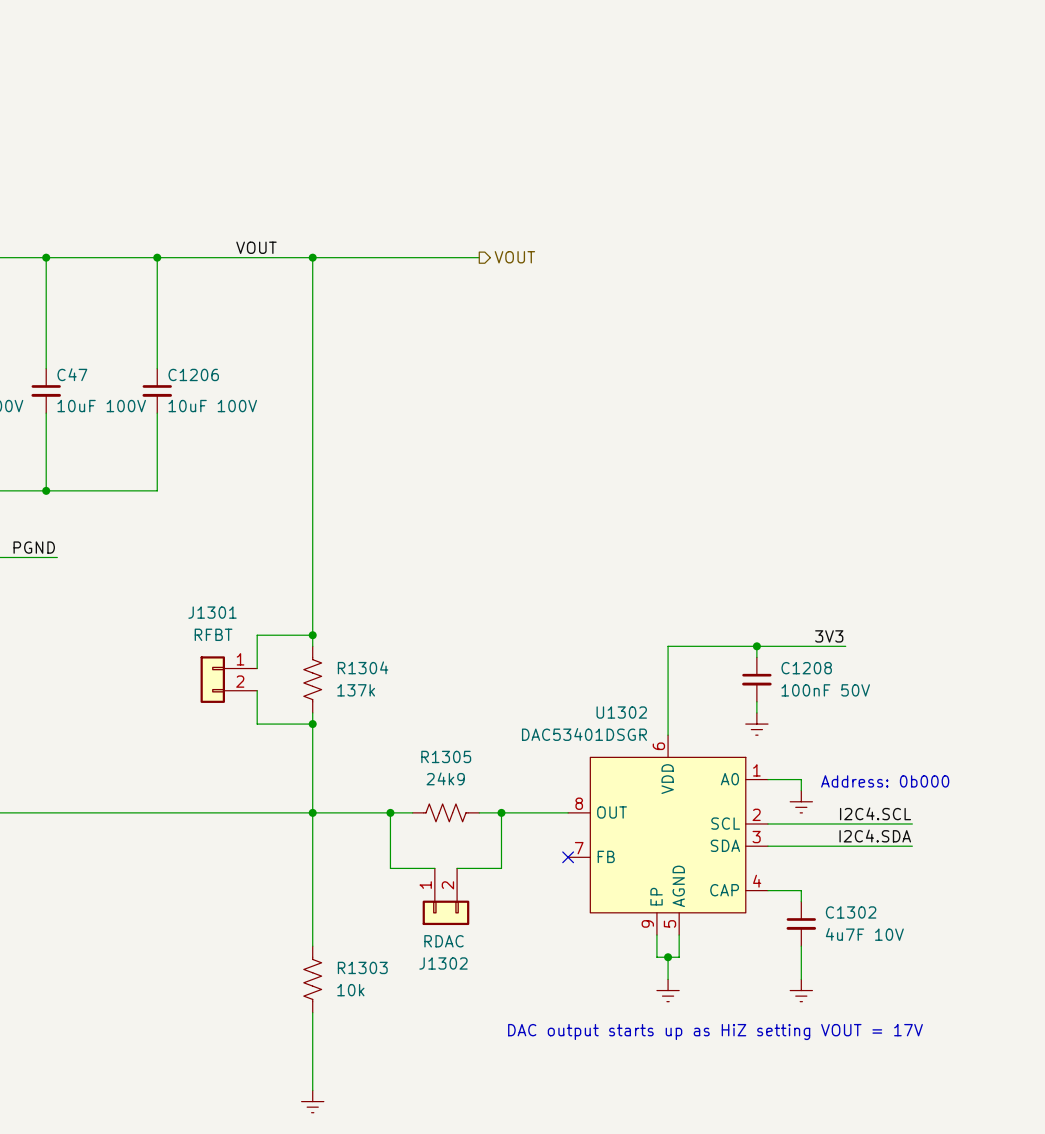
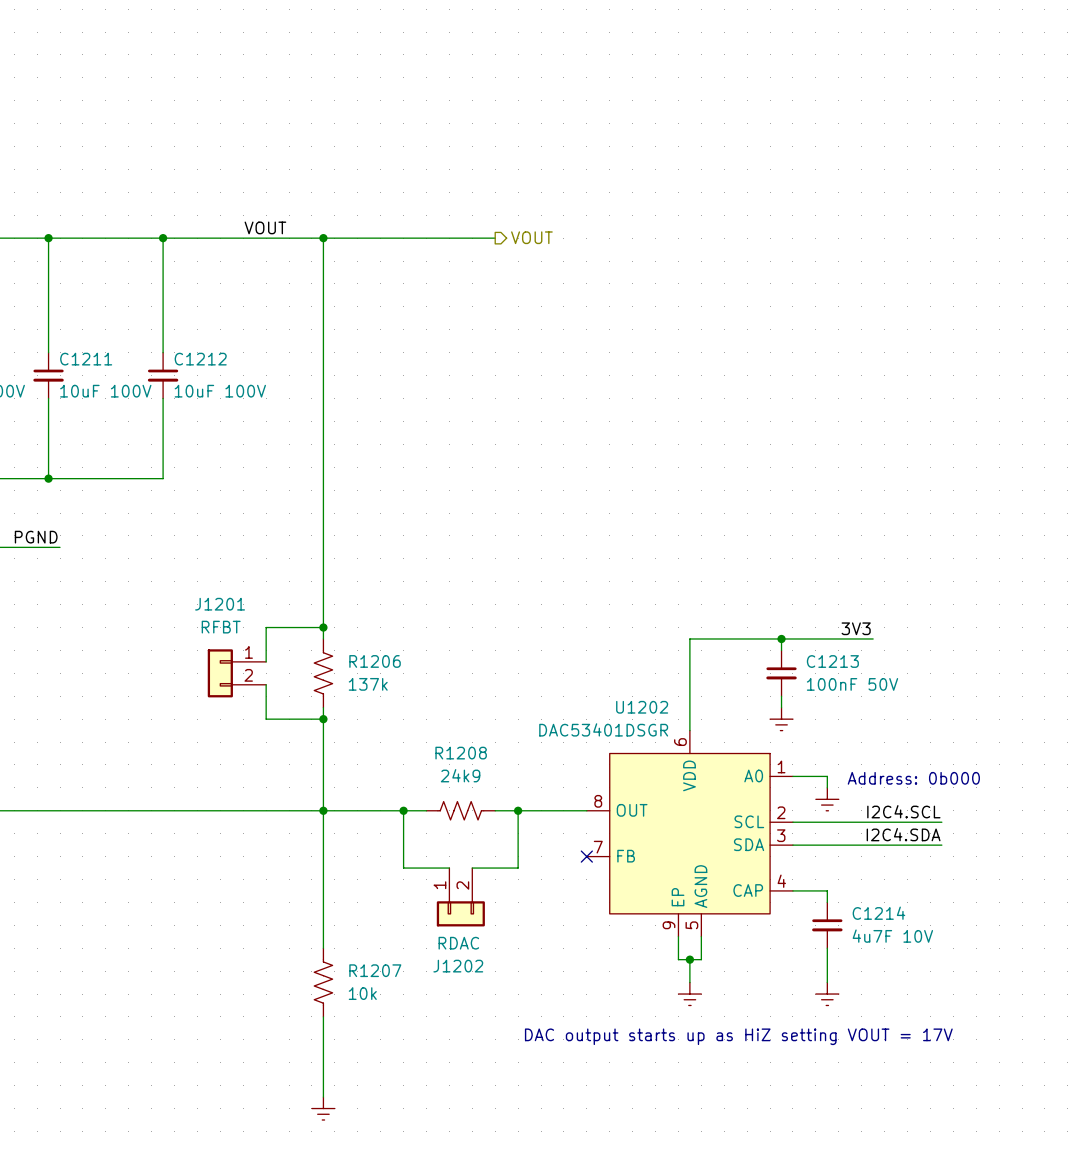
C47 name: C47 (72, 374) -> C1211 (86, 359)
C1206 name: C1206 (193, 374) -> C1212 (200, 359)
J1301 name: J1301 (212, 612) -> J1201 (220, 604)
R1304 name: R1304 (363, 667) -> R1206 (375, 661)
C1208 name: C1208 (806, 668) -> C1213 (832, 661)
U1302 name: U1302 (621, 712) -> U1202 (642, 707)
R1305 name: R1305 (446, 756) -> R1208 (461, 753)
C1302 name: C1302 (851, 912) -> C1214 (878, 913)
J1302 name: J1302 (443, 963) -> J1202 (458, 966)
R1303 name: R1303 (362, 967) -> R1207 (375, 970)

